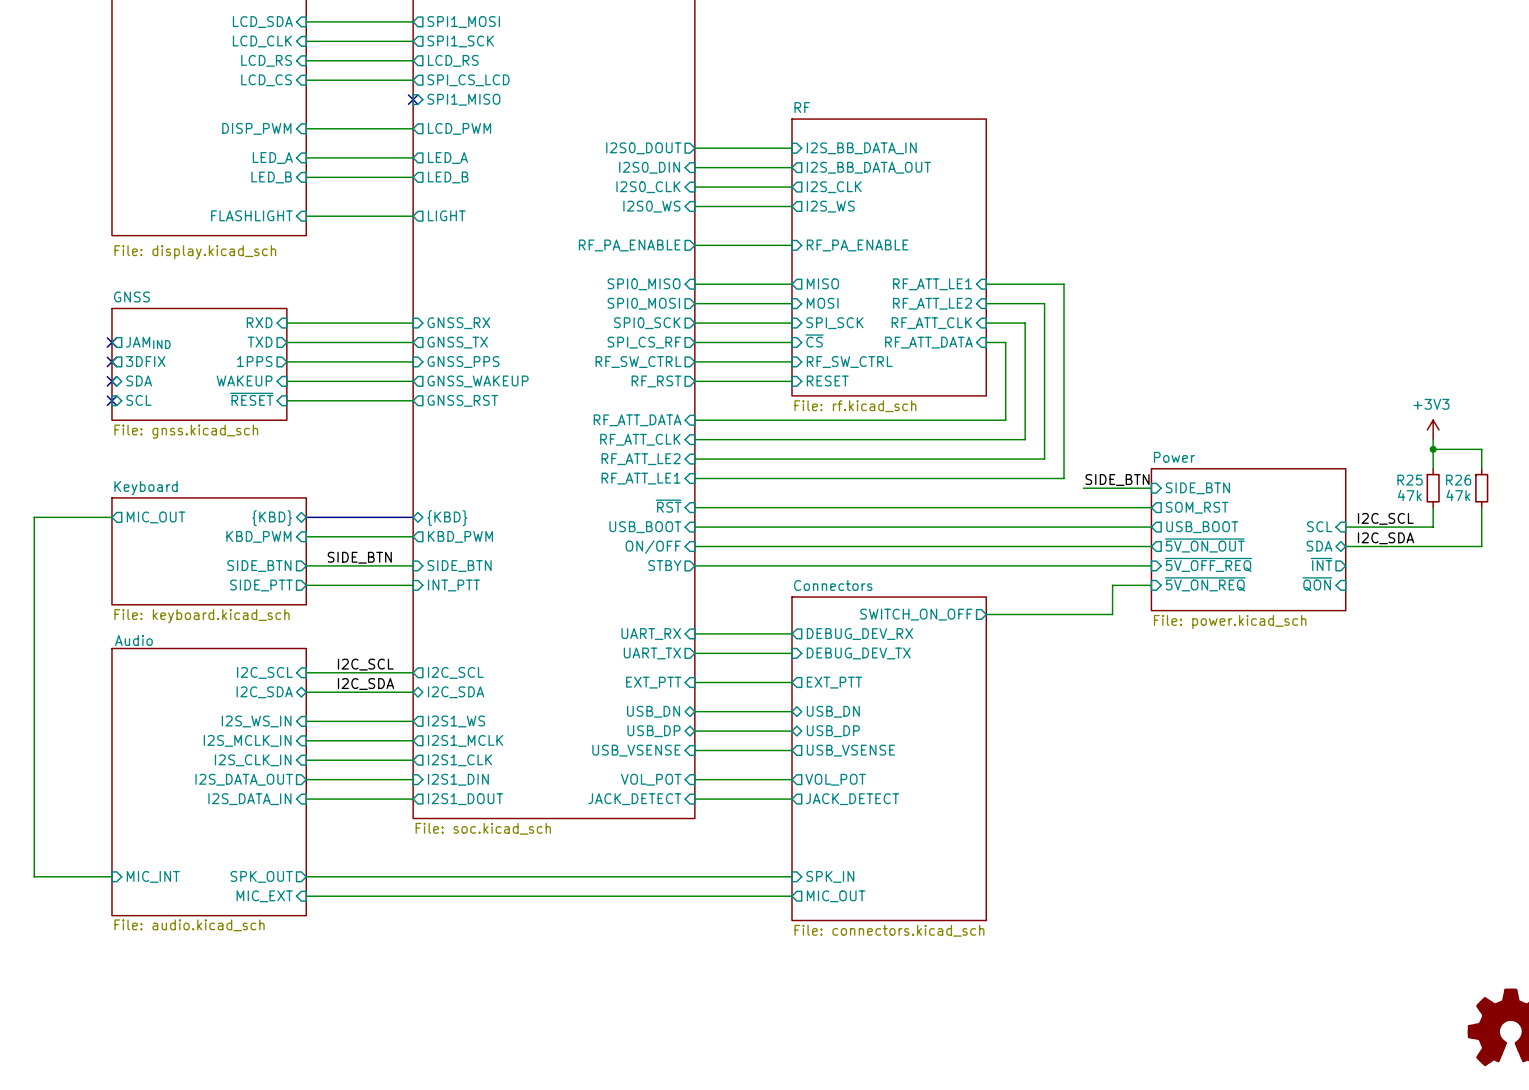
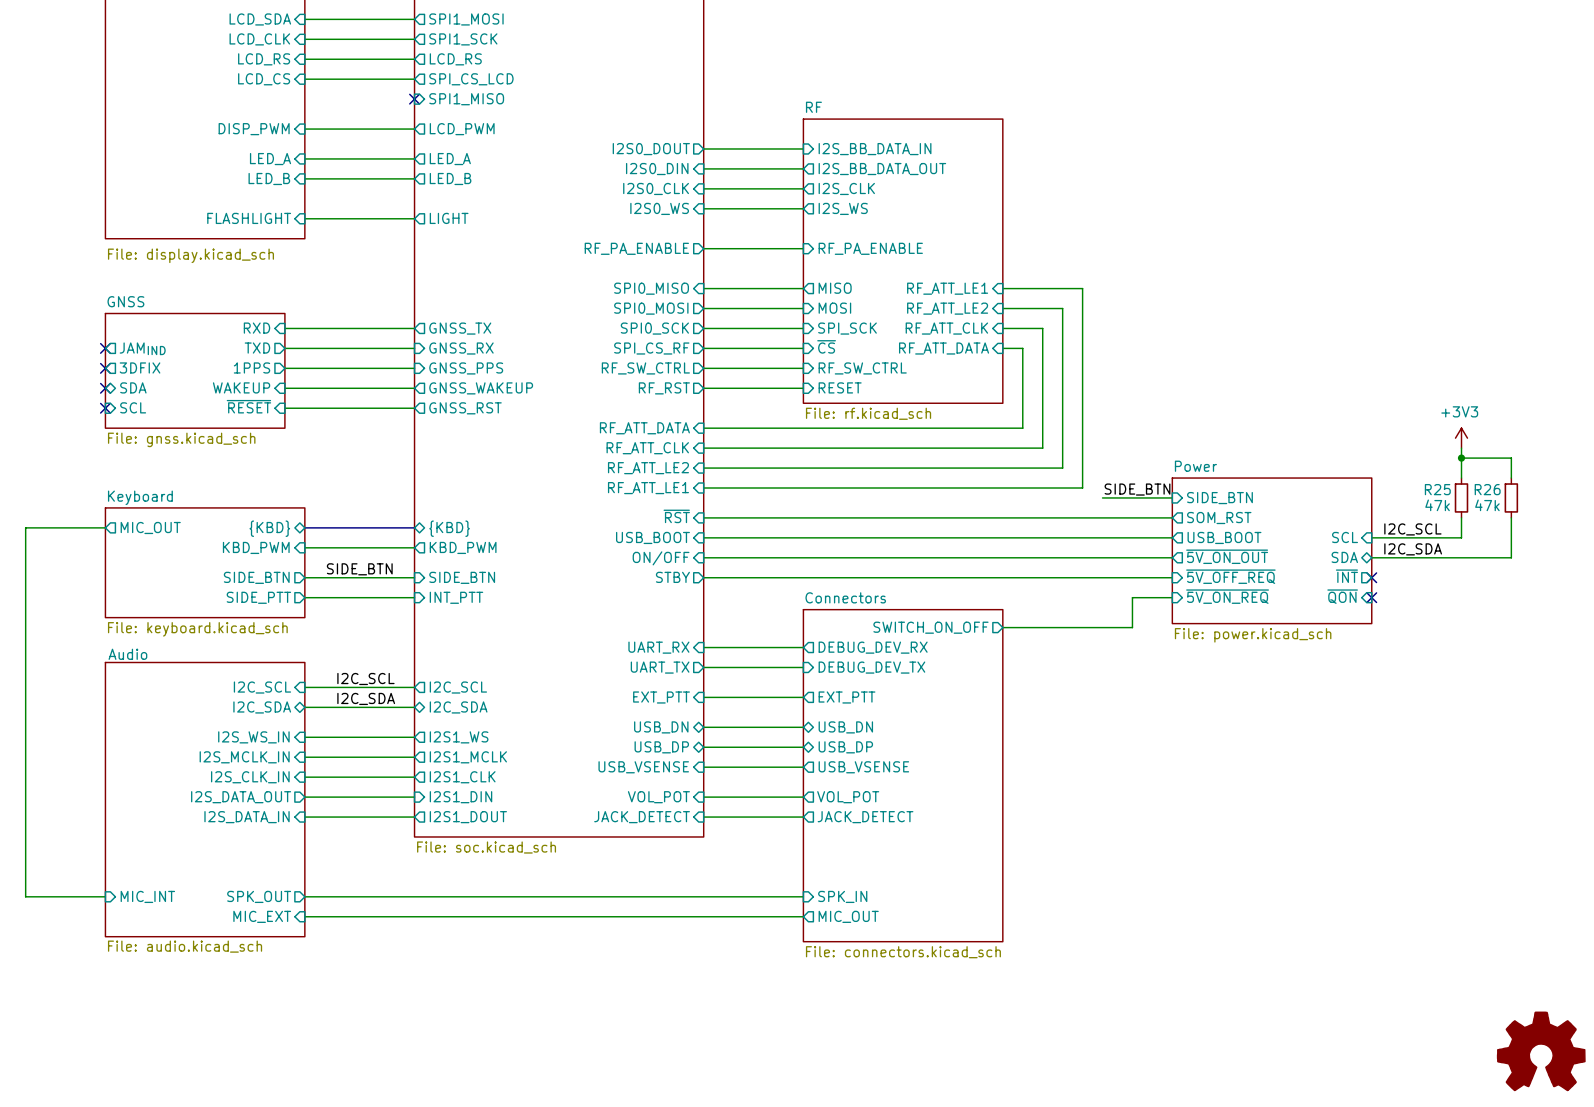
sheet pin shape: input (458, 323) -> output (460, 328)
sheet pin: GNSS_RX (458, 323) -> GNSS_TX (460, 328)
sheet pin shape: output (457, 342) -> input (461, 348)
sheet pin: GNSS_TX (457, 342) -> GNSS_RX (461, 348)
no-connect mark: none -> (1371, 577)
no-connect mark: none -> (1371, 597)

